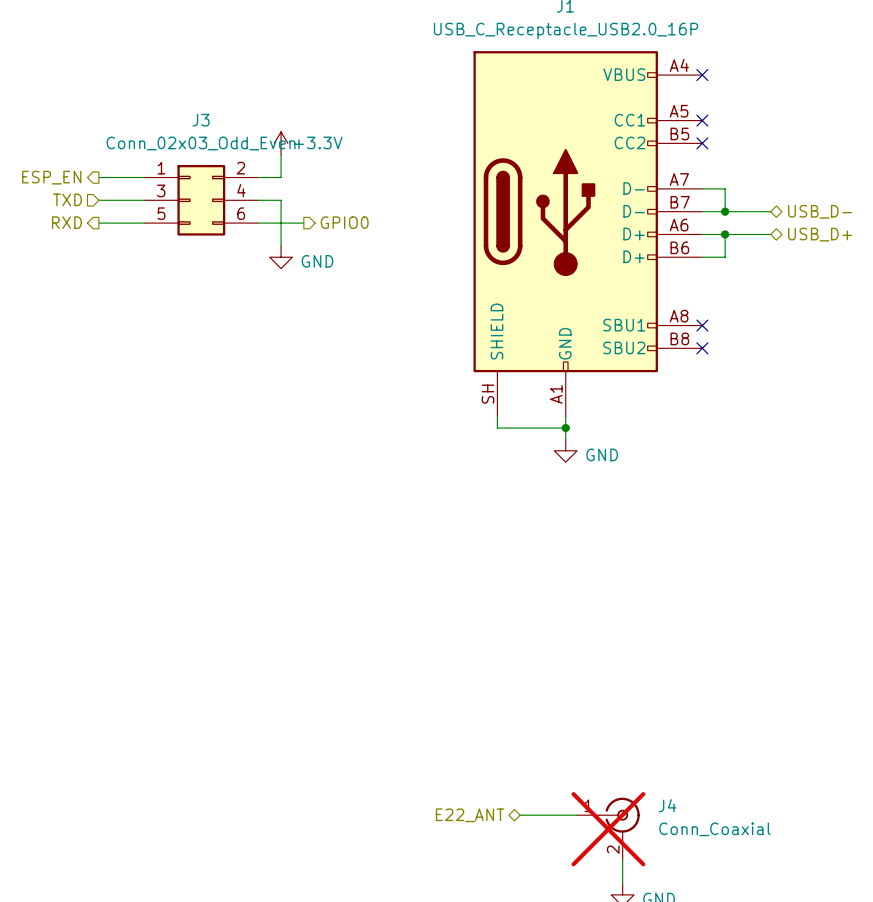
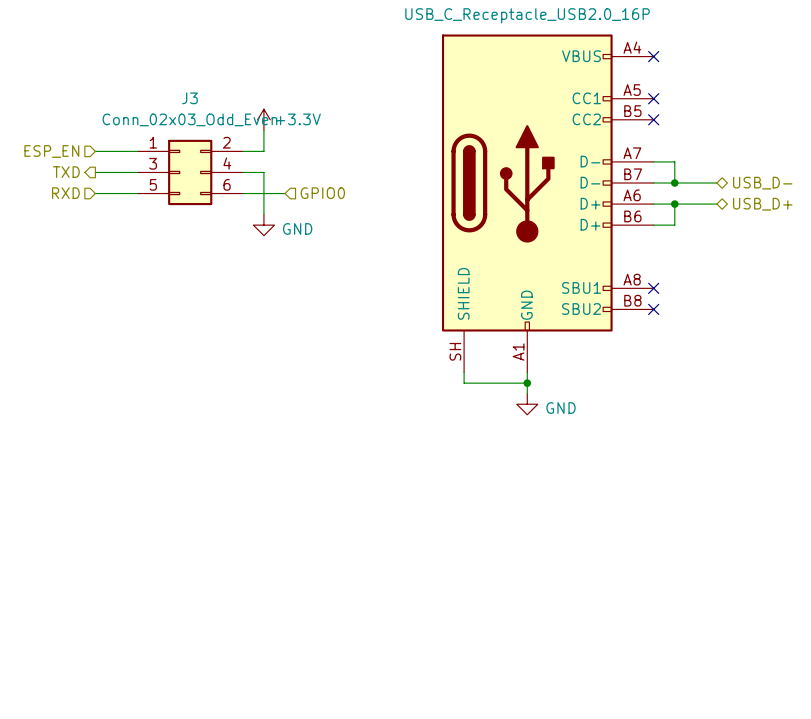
hierarchical label shape: output (51, 177) -> input (51, 151)
hierarchical label shape: input (67, 199) -> output (66, 172)
hierarchical label shape: output (66, 222) -> input (65, 193)
hierarchical label shape: output (344, 222) -> input (322, 193)

